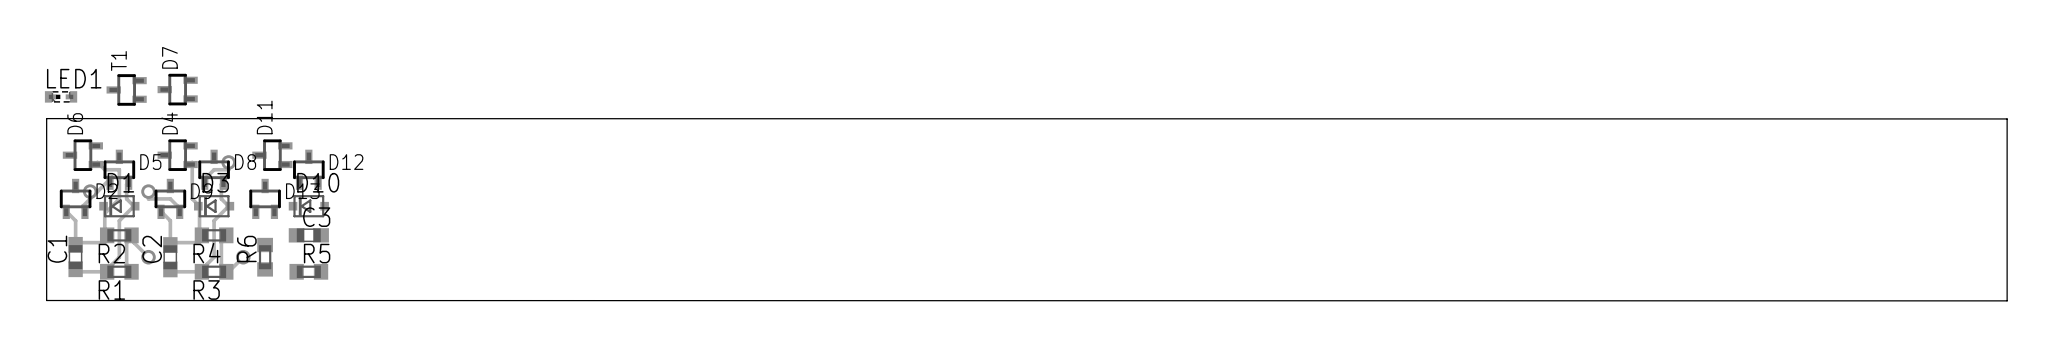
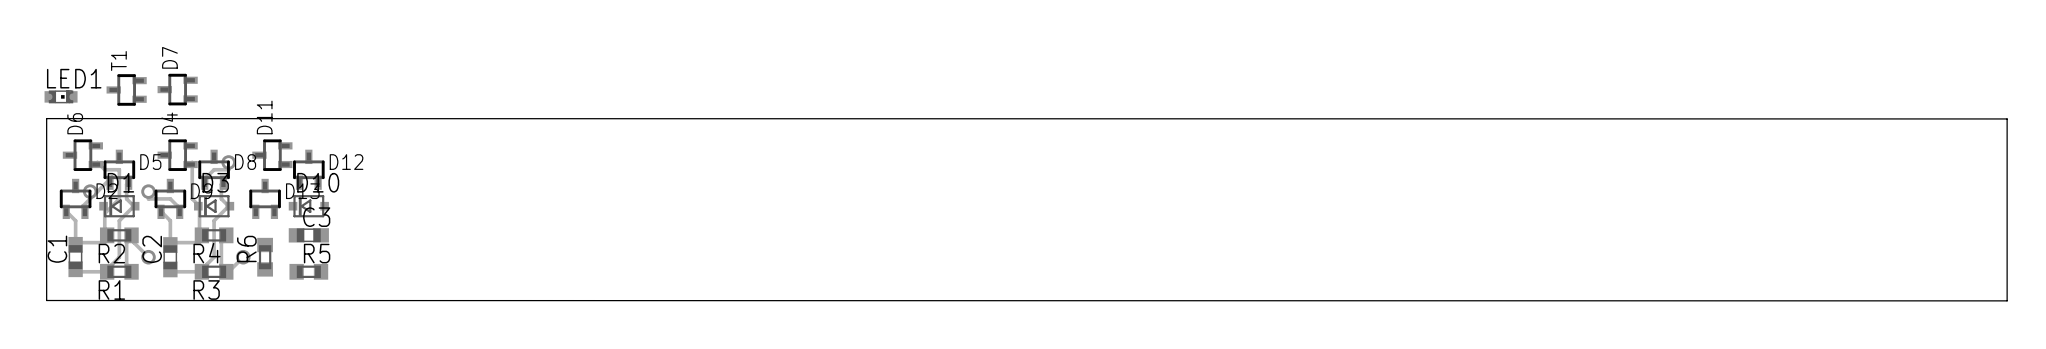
LED1 footprint: [44, 91, 78, 103] -> [44, 90, 78, 104]

